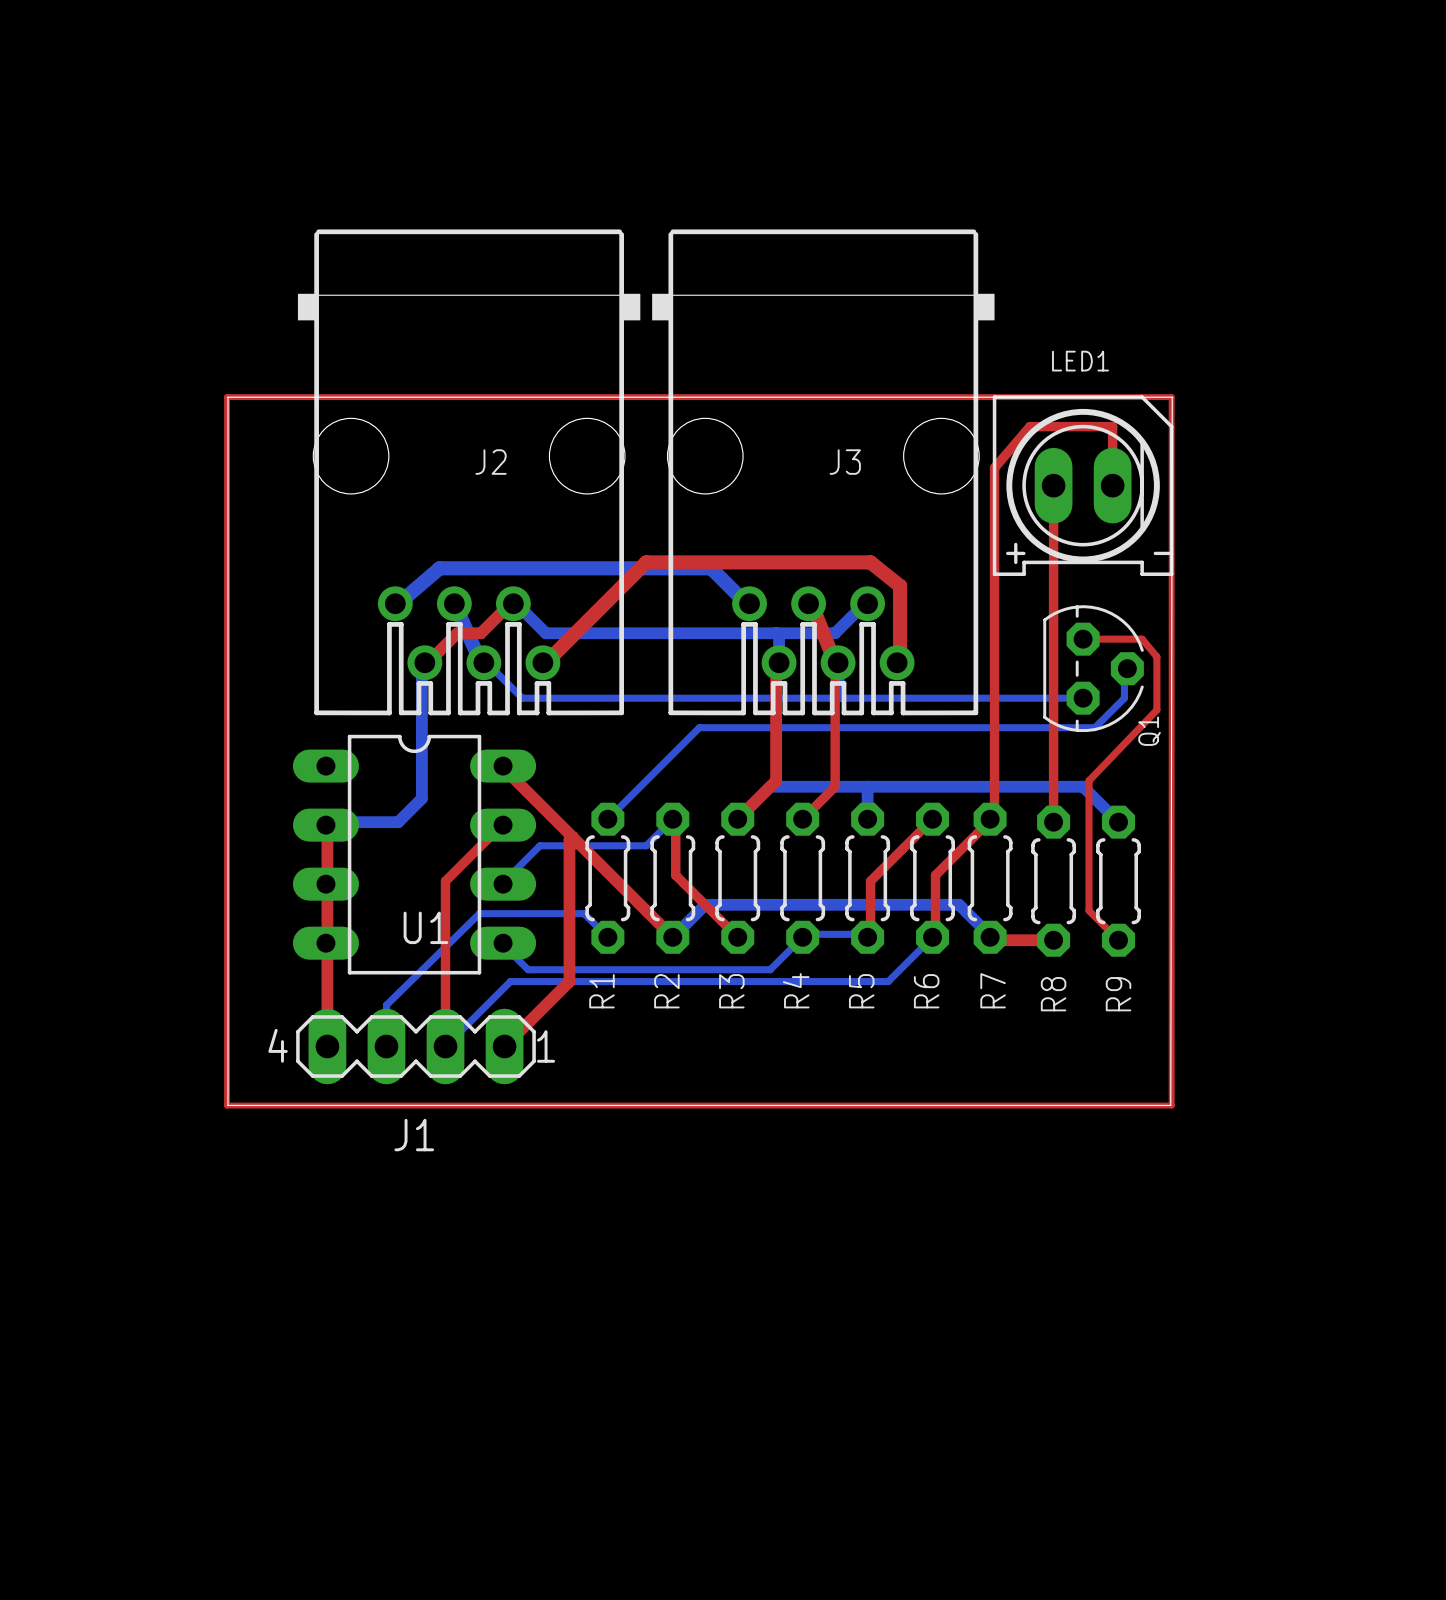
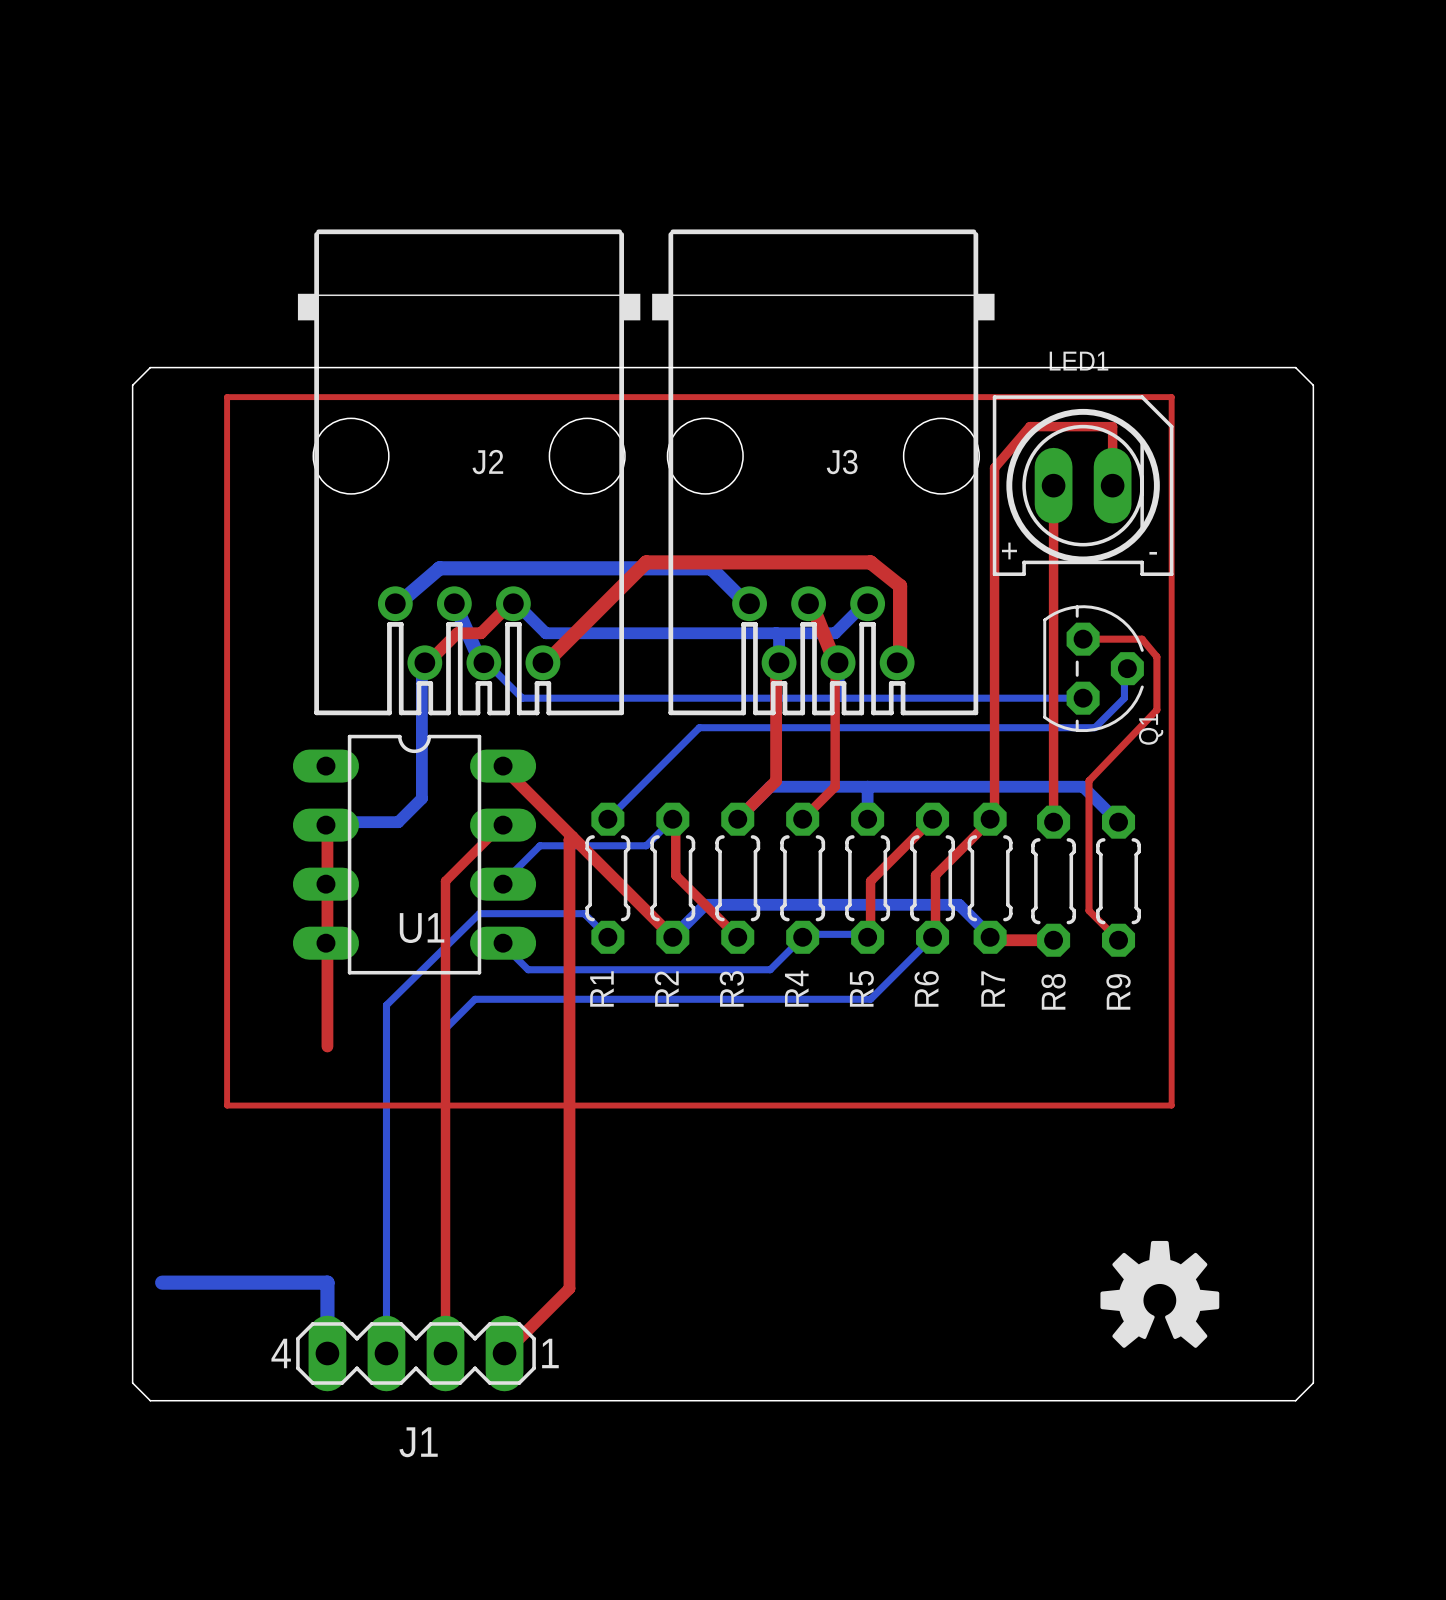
board edge: (227, 397) (1172, 397) (1170, 1105) (227, 1105) (227, 397) -> (150, 367) (132, 385) (132, 1383) (150, 1400) (1295, 1400) (1313, 1383) (1313, 385) (1295, 367) (150, 367)
top track: (569, 981) (504, 1046) -> (569, 981) (569, 1288) (504, 1353)
bottom track: (888, 981) (510, 981) (445, 1046) -> (888, 981) (870, 999) (475, 999) (445, 1028) (445, 1353)
bottom track: none -> (386, 1046) (386, 1353)
J1 position: (416, 1046) -> (416, 1353)
top track: none -> (445, 1046) (445, 1353)
drawing: none -> [1100, 1240, 1220, 1348]
bottom track: none -> (162, 1282) (327, 1282) (327, 1353)

